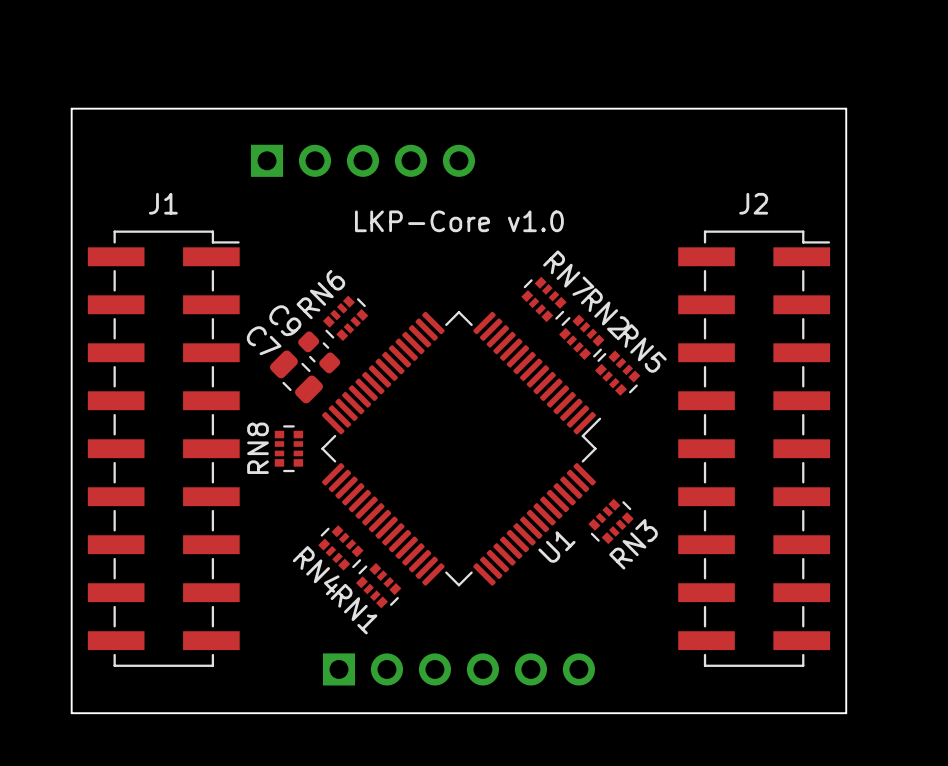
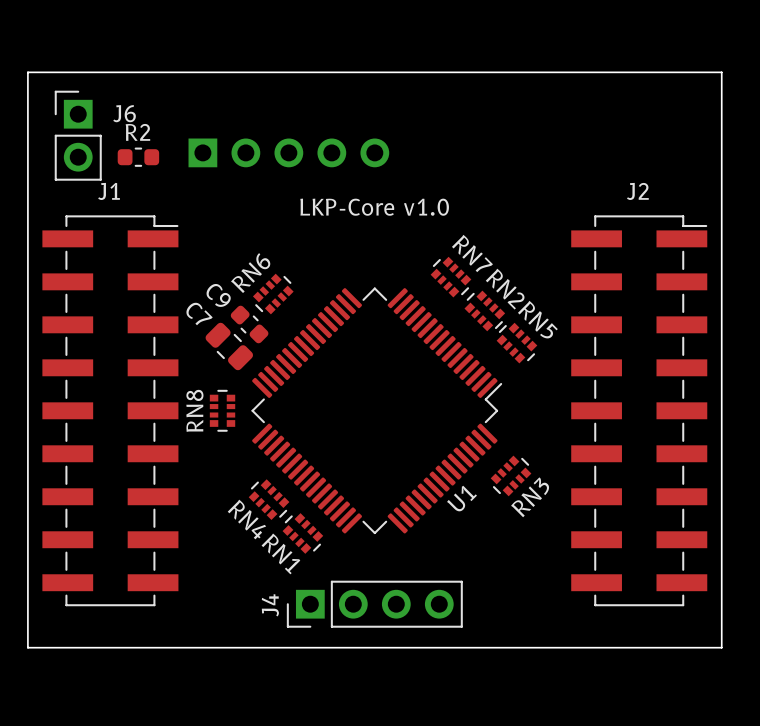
board edge: (71, 108) (846, 108) -> (27, 106) (27, 72) (721, 72) (721, 106)
J6: none -> (78, 135)
R2: none -> (138, 157)
J4: none -> (374, 604)
part: (458, 669) -> none

